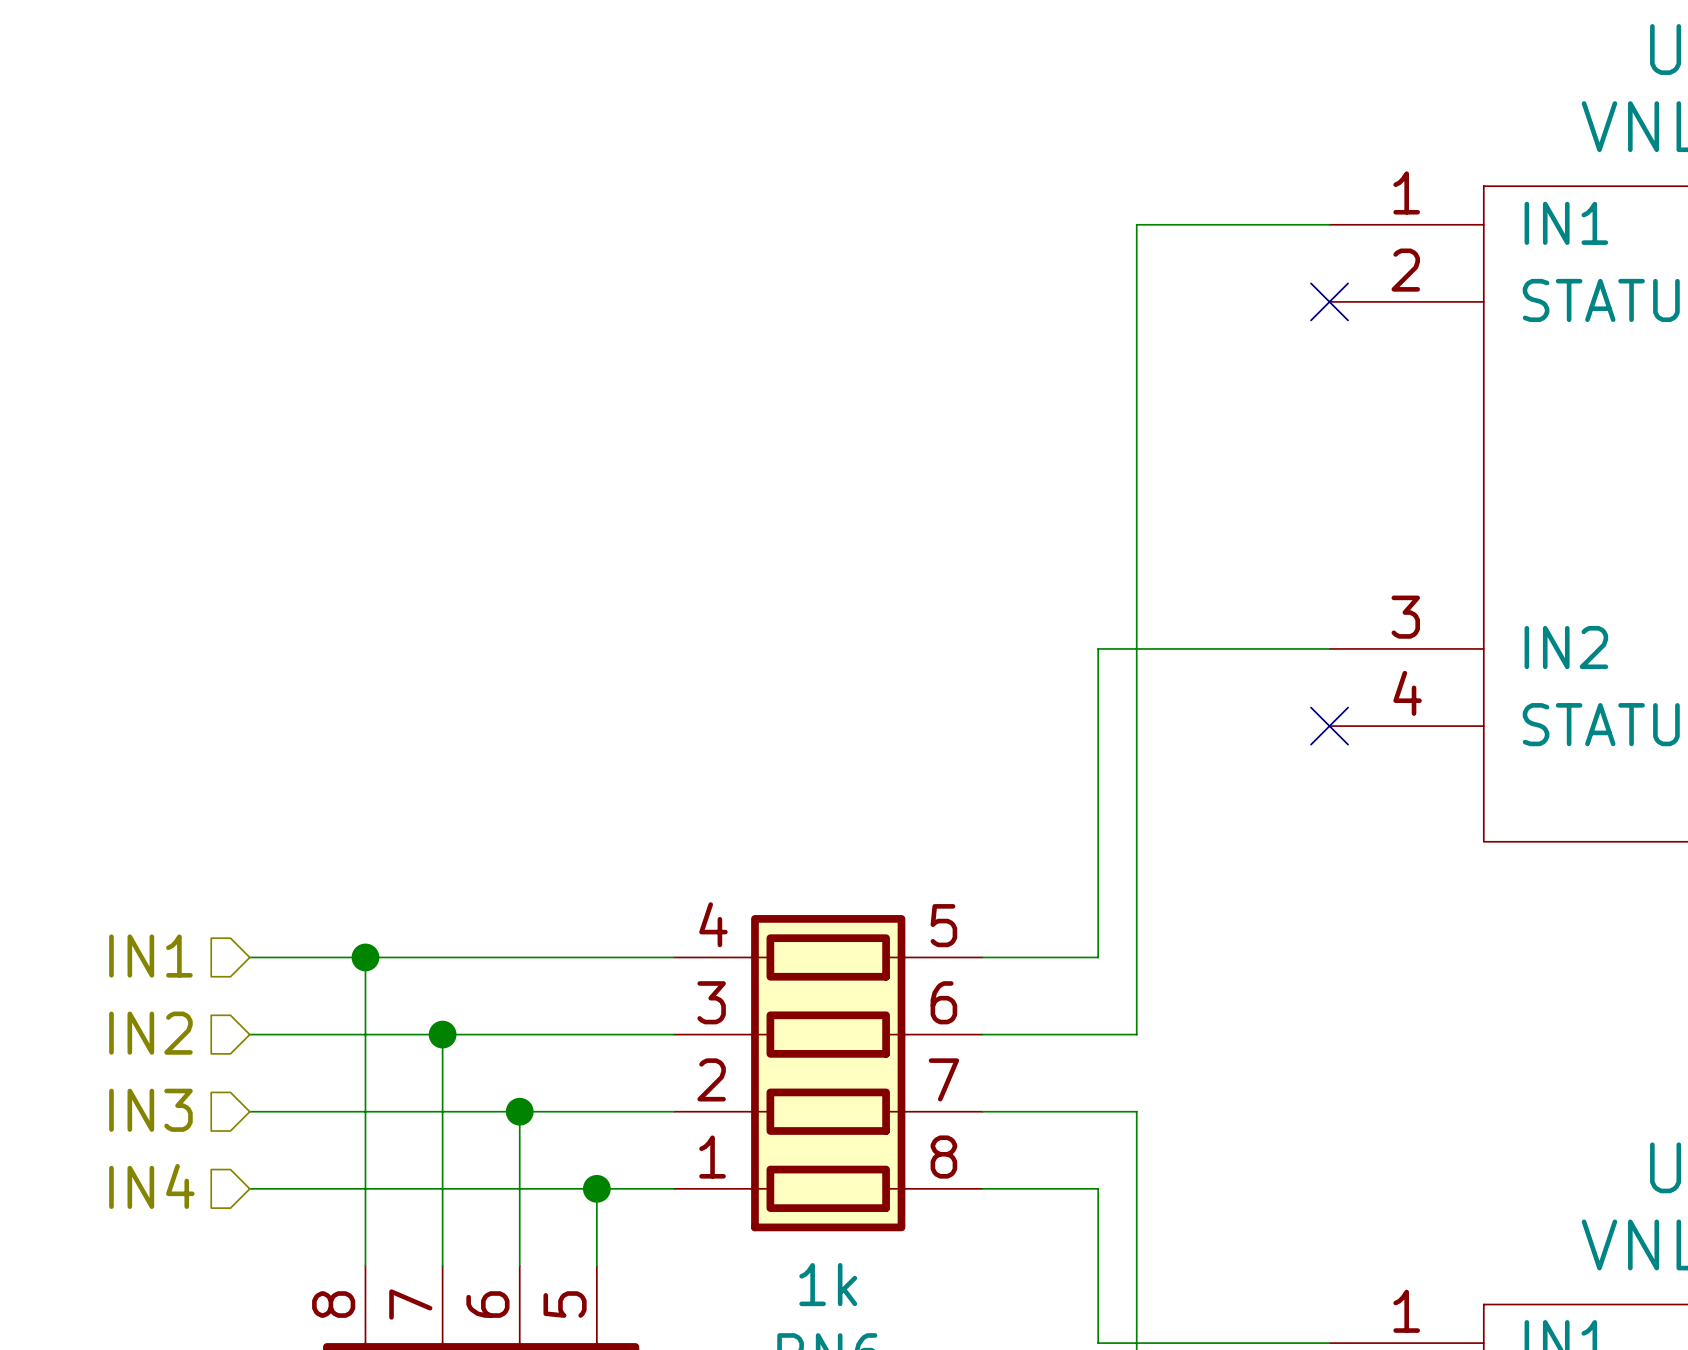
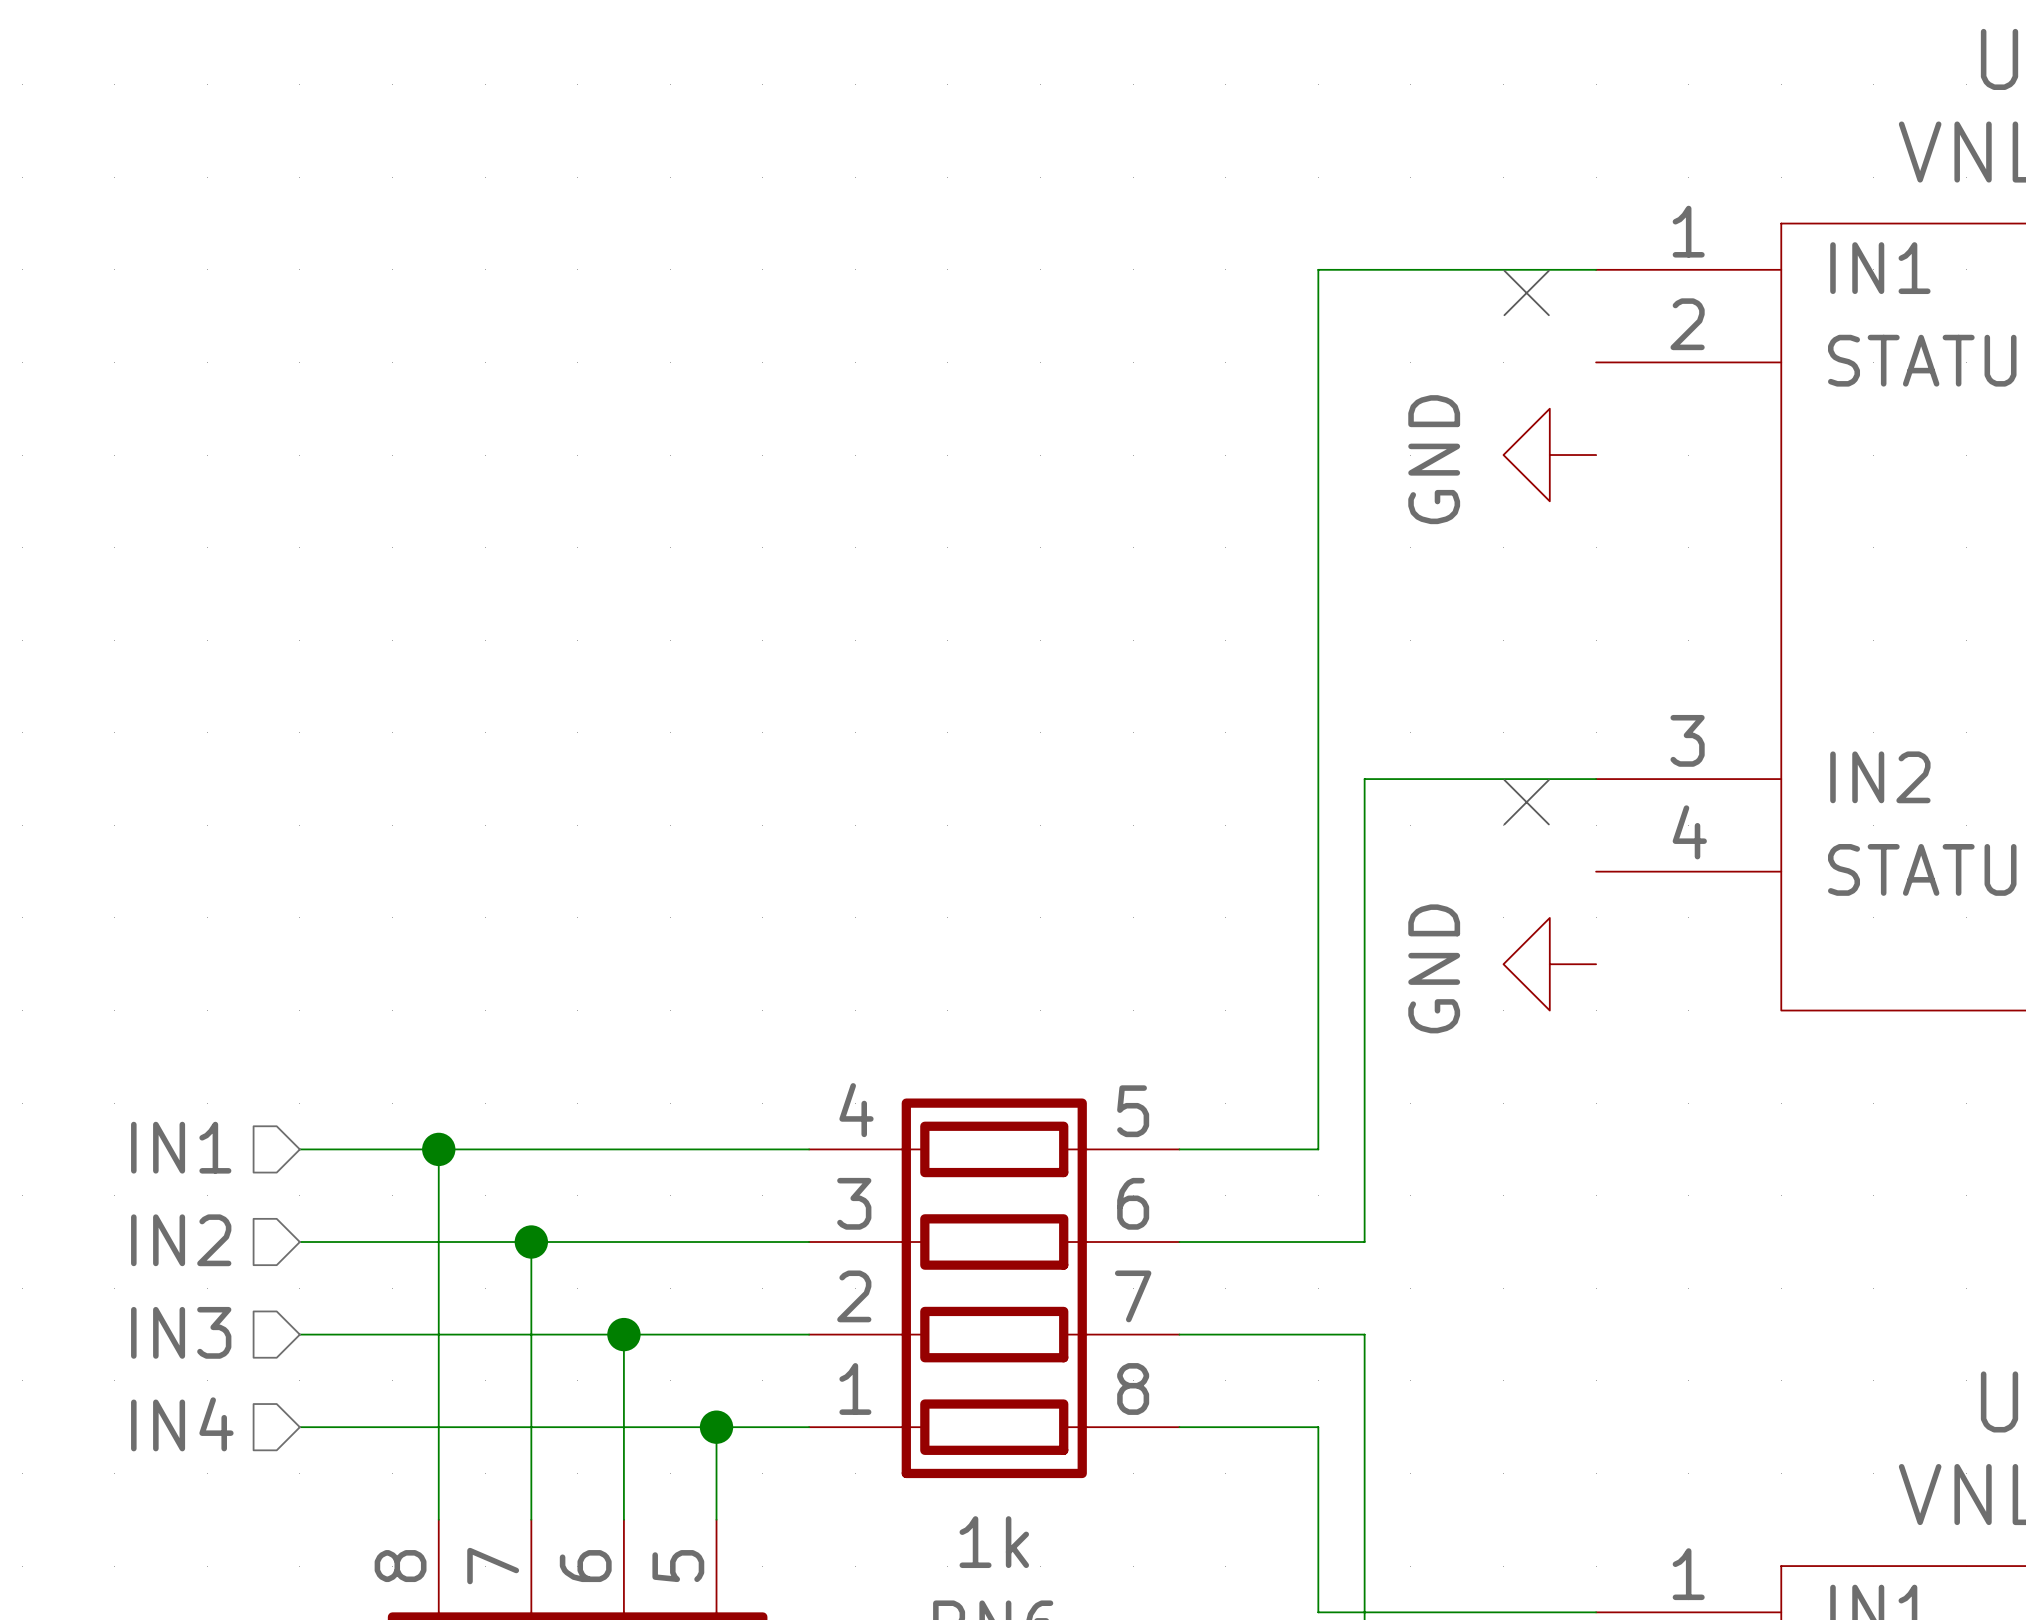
wire: (1136, 224) (1136, 648) (1098, 648) -> (1364, 269) (1318, 269) (1318, 779)
no-connect mark position: (1329, 301) -> (1526, 292)
power symbol: none -> GND (1549, 455)
no-connect mark position: (1329, 726) -> (1526, 802)
power symbol: none -> GND (1549, 964)

